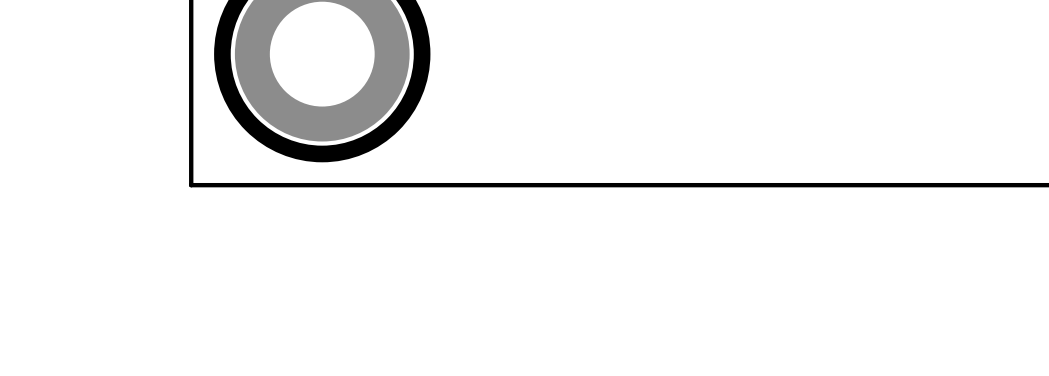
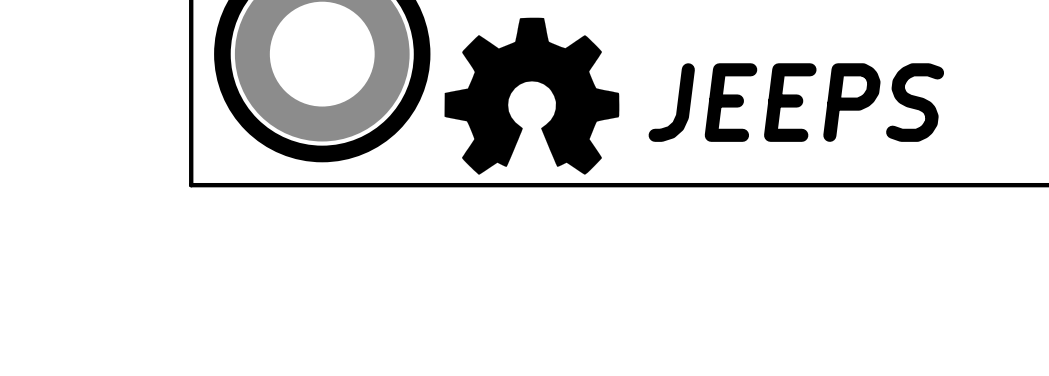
drawing: none -> [444, 17, 620, 175]
text: none -> JEEPS (796, 102)

